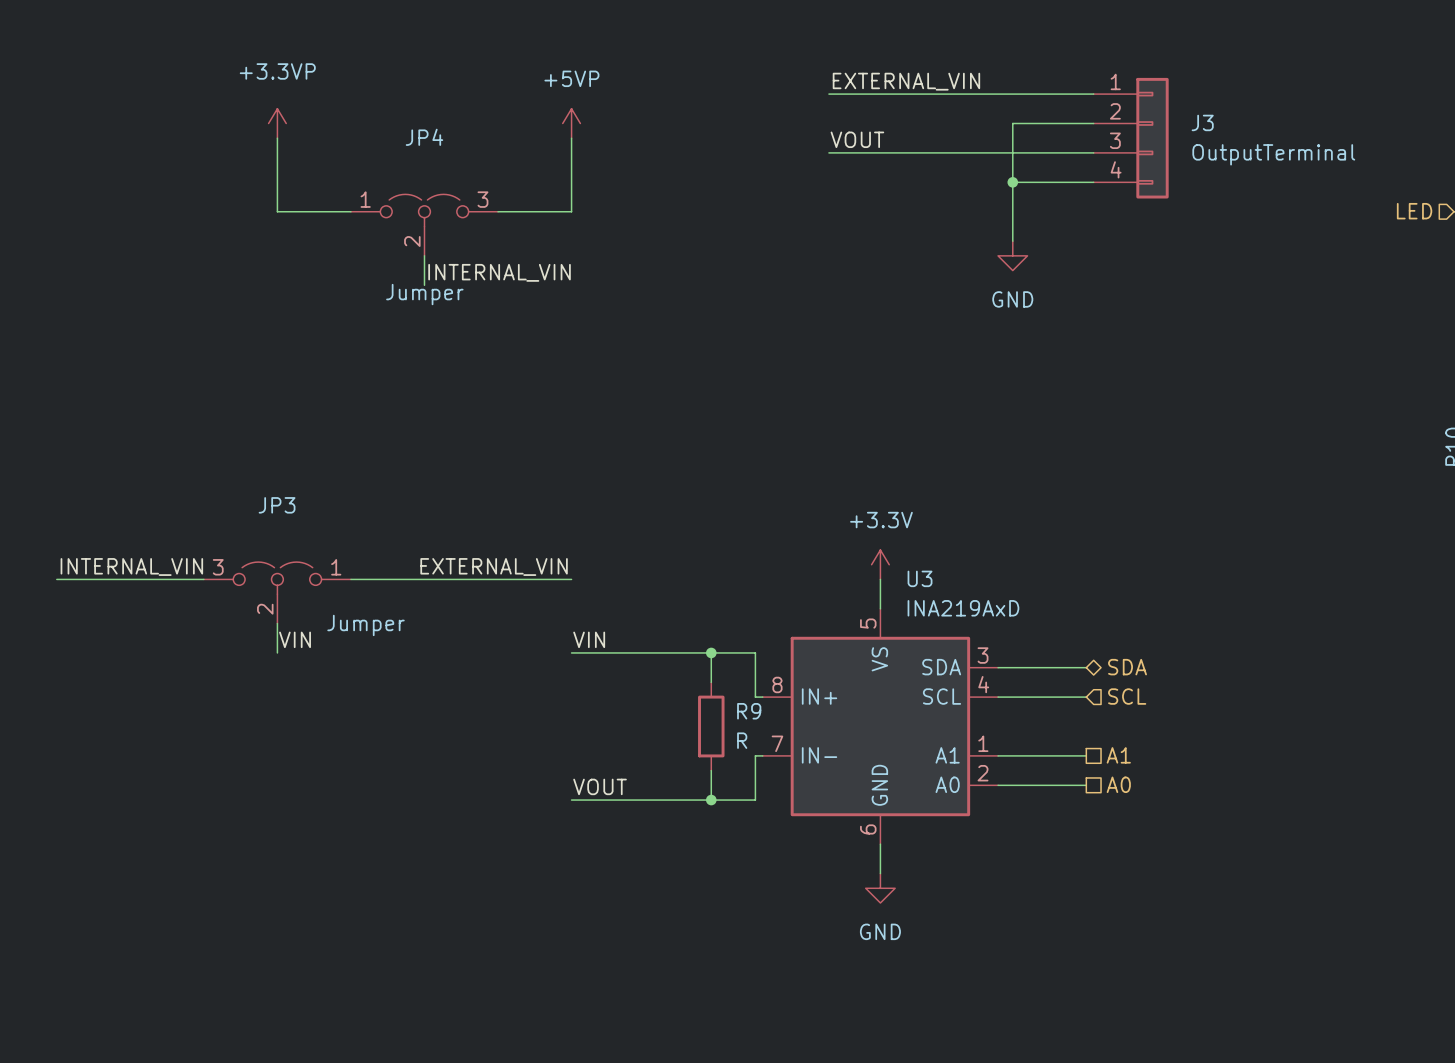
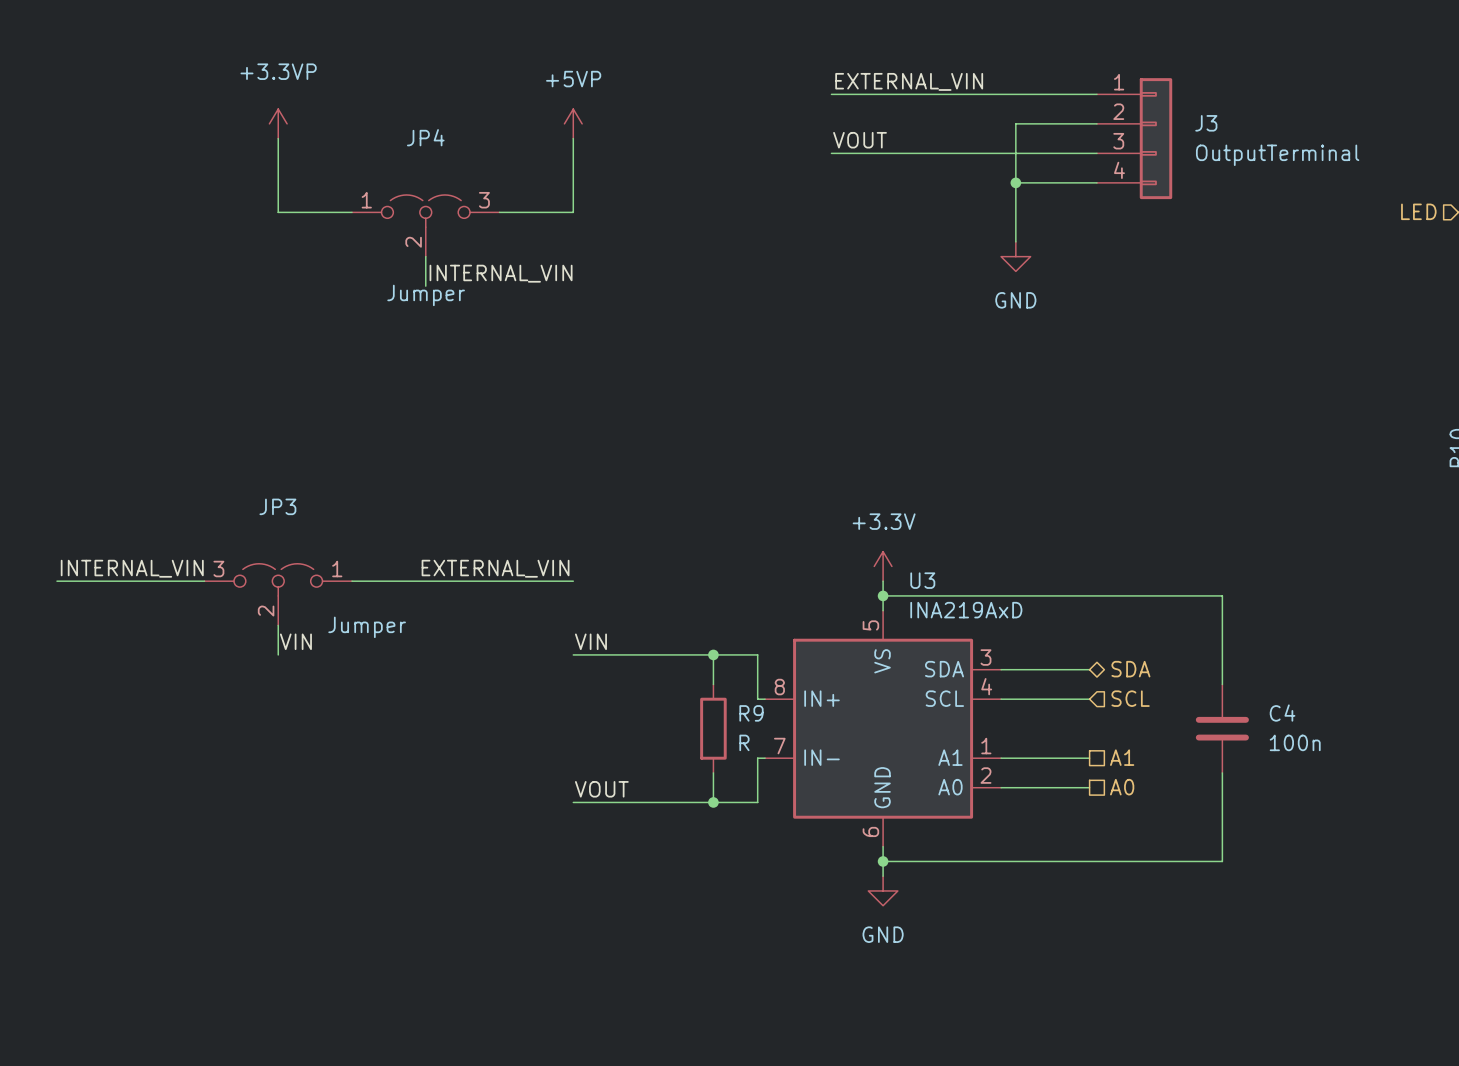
wire: none -> (883, 595) (1222, 595) (1222, 684)
junction: none -> (883, 595)
C4: none -> 100n (1222, 728)
wire: none -> (1222, 772) (1222, 861) (883, 861)
junction: none -> (883, 861)

